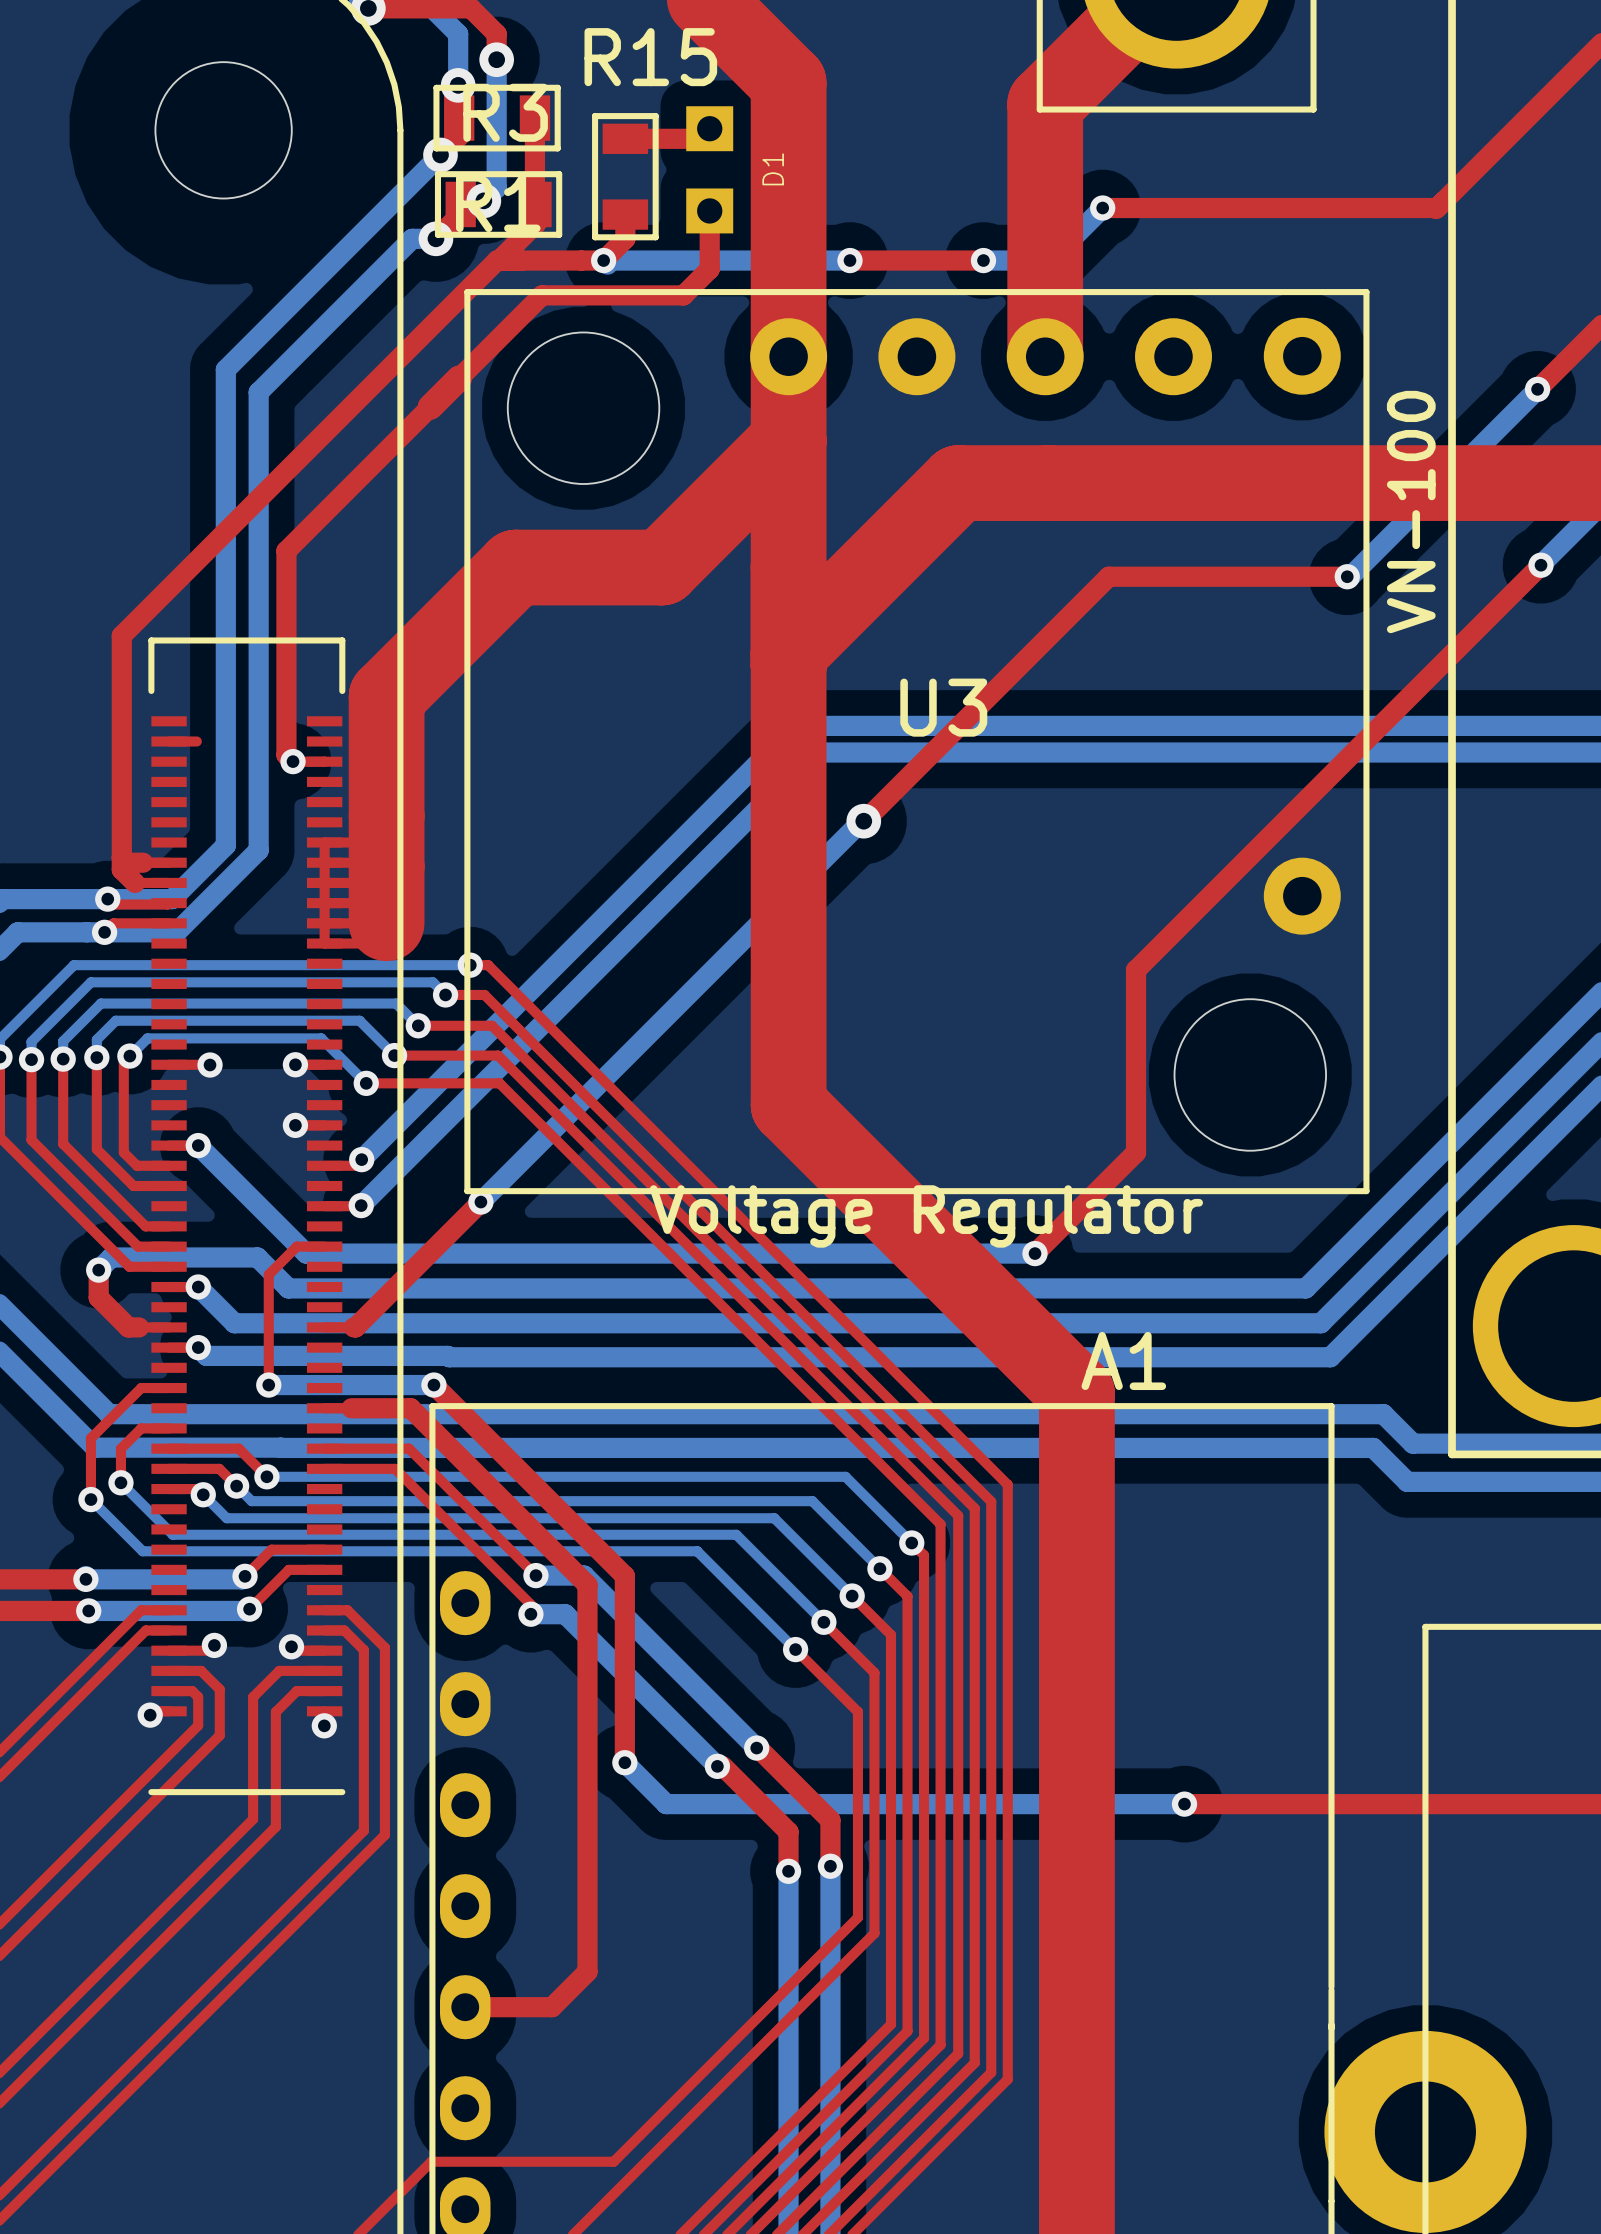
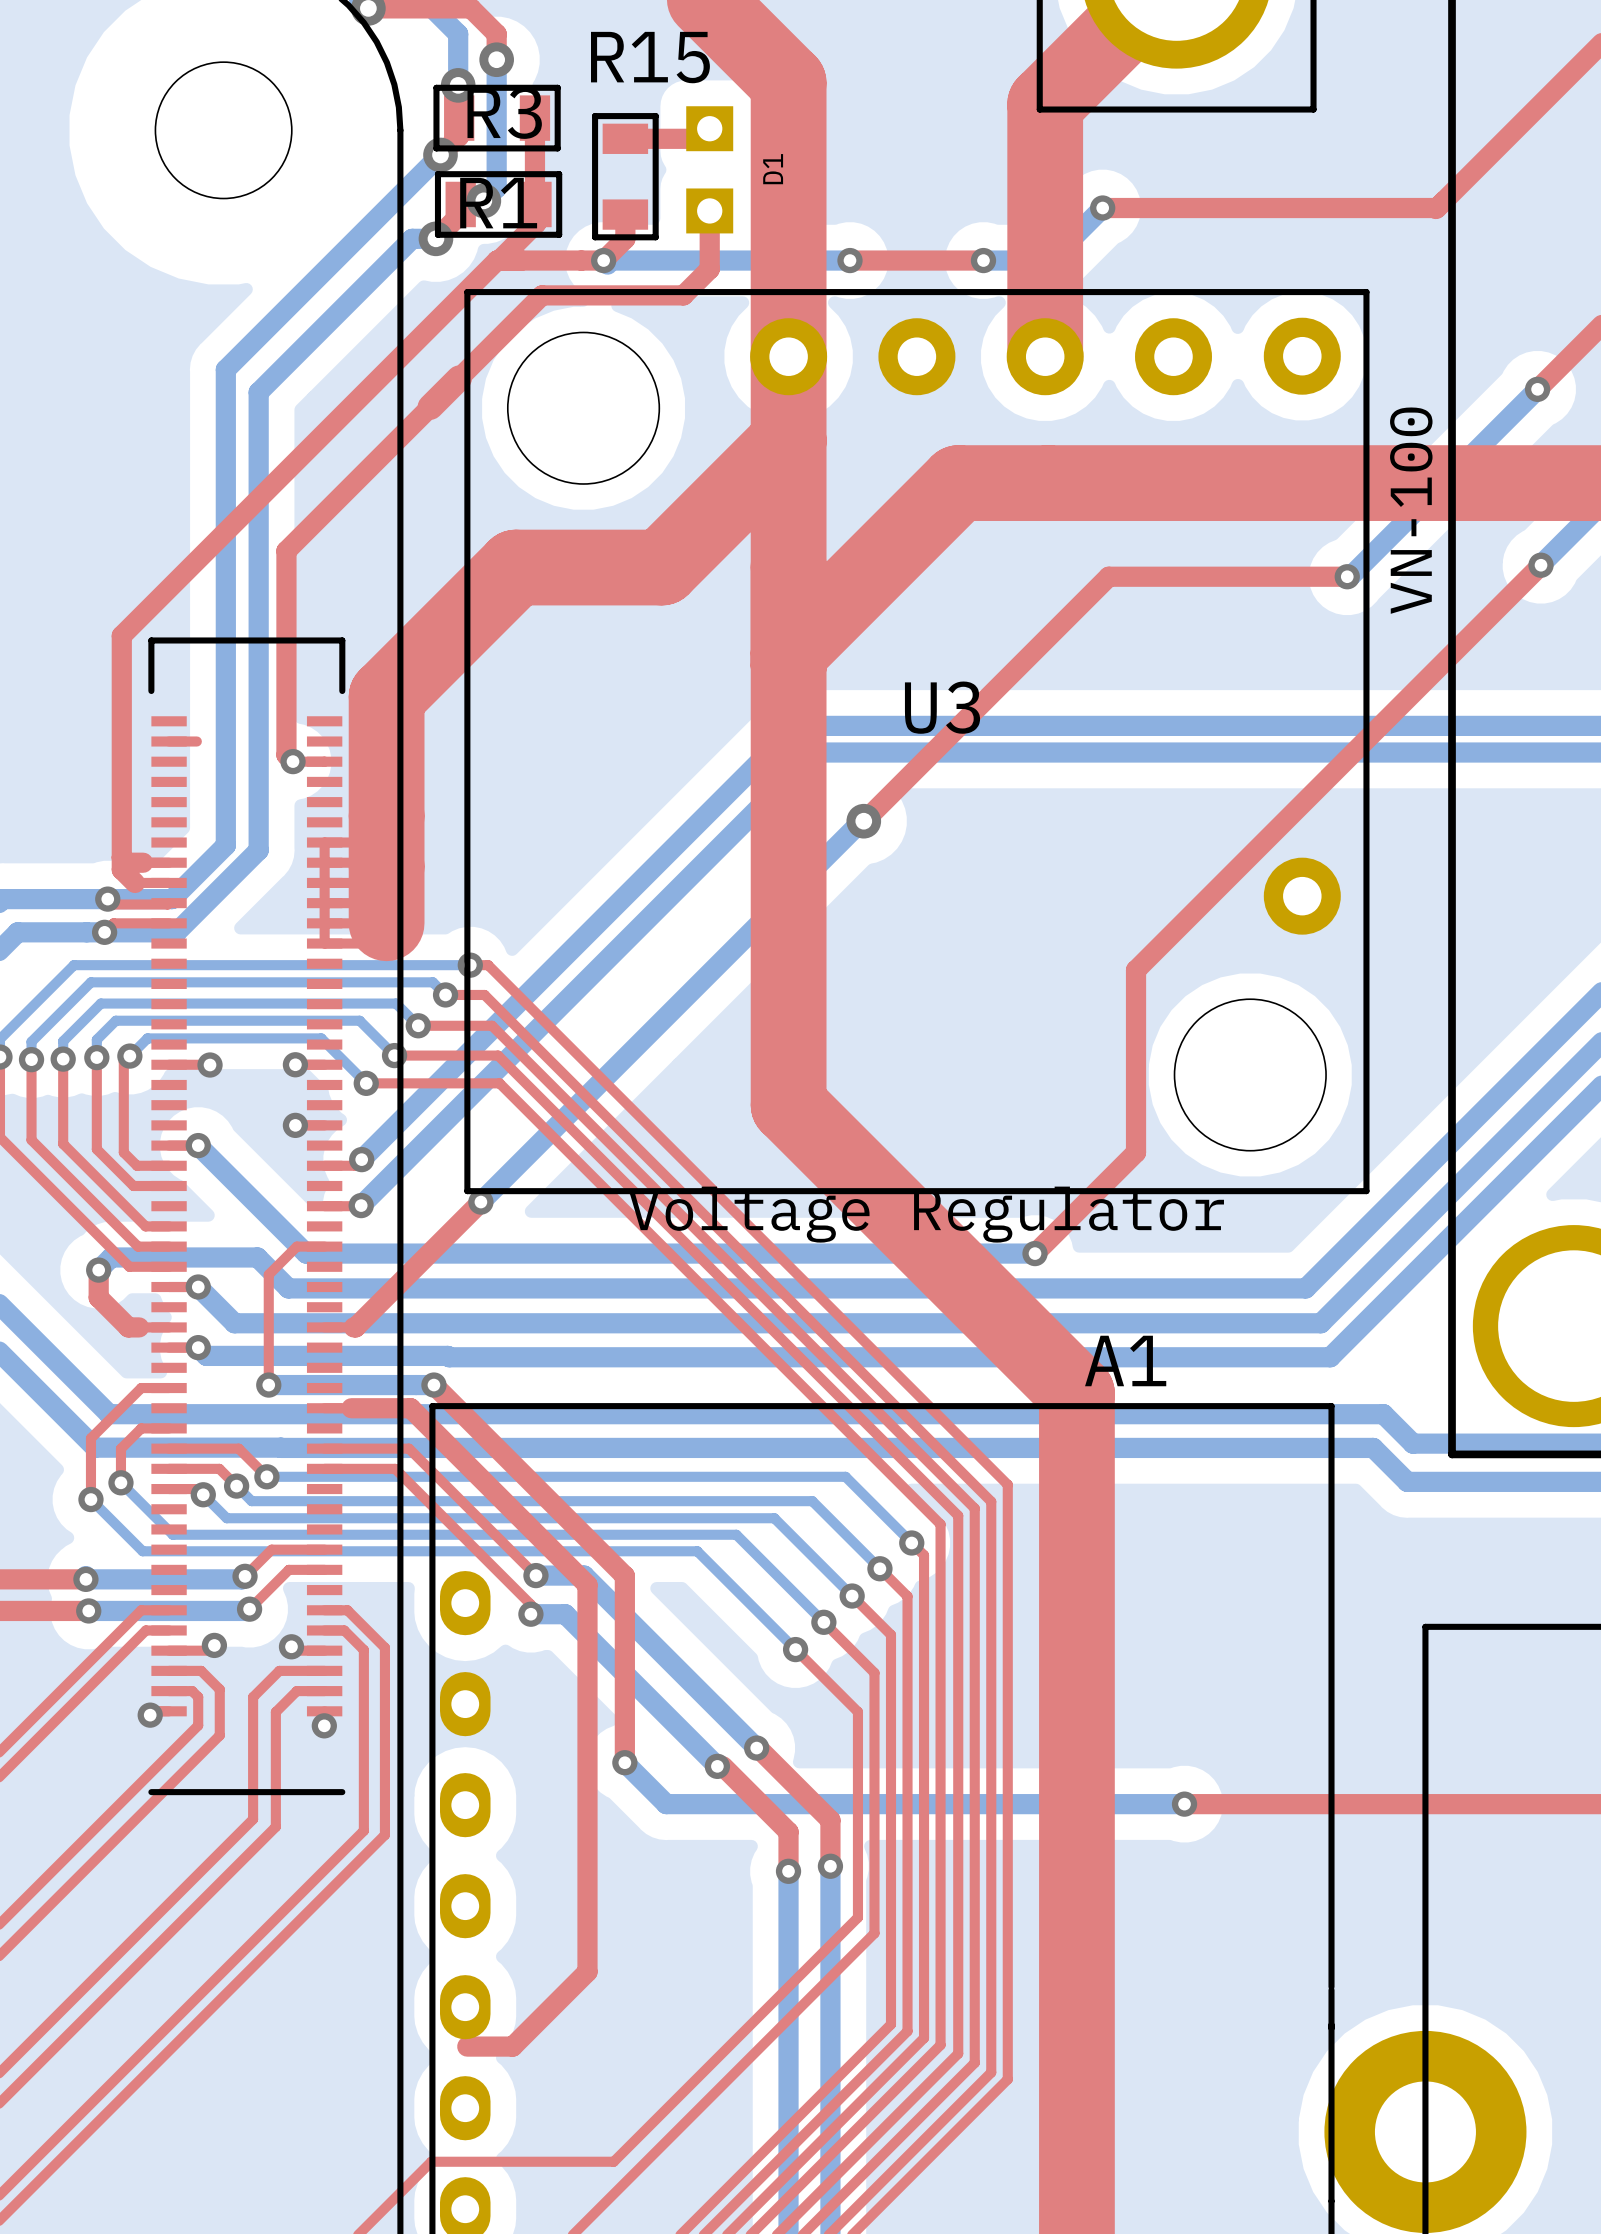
top track: (465, 2007) (552, 2007) -> (467, 2046) (512, 2046) (552, 2007)

